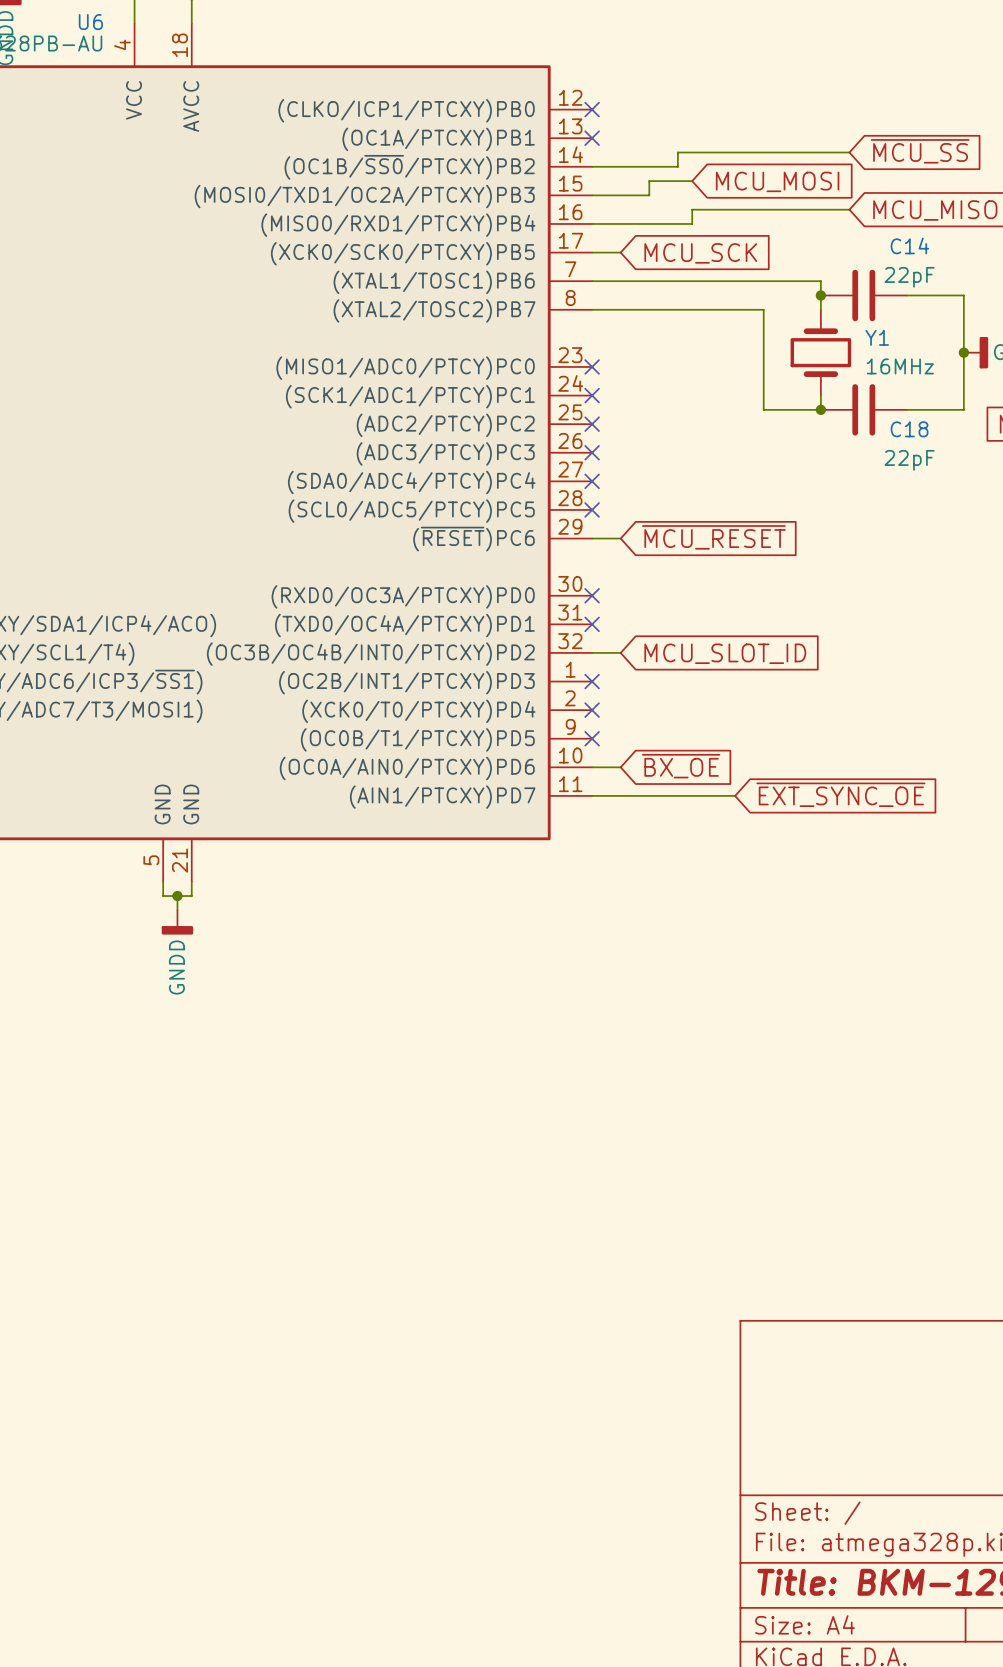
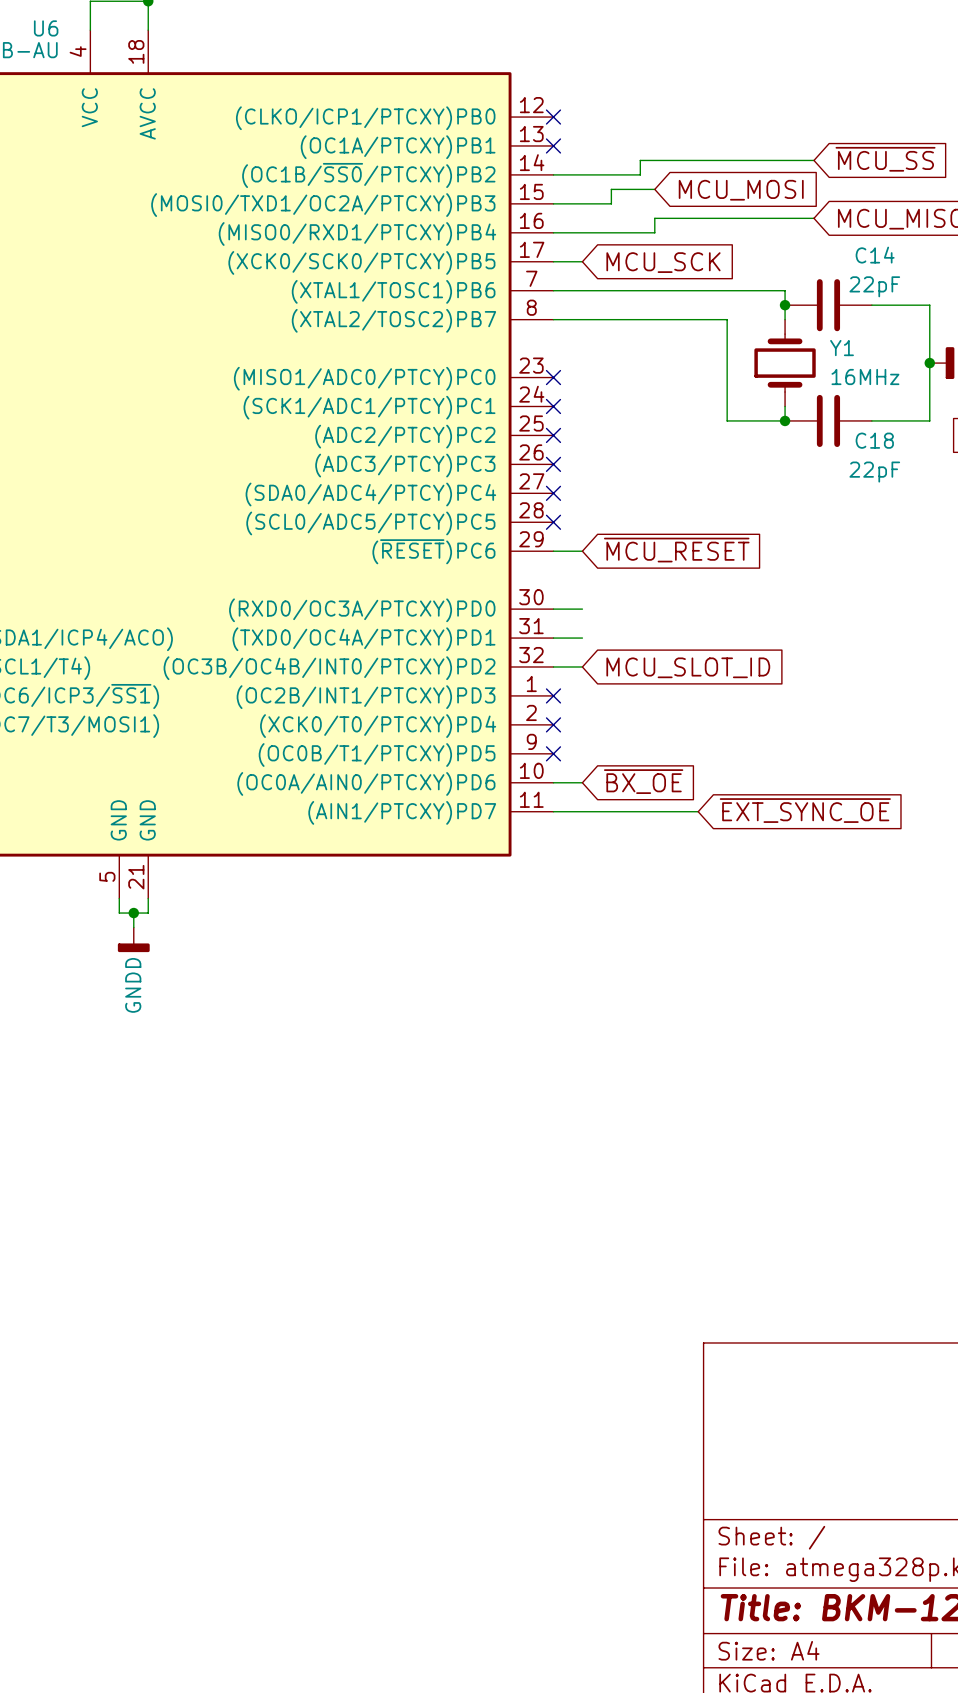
wire: none -> (553, 609) (582, 609)
no-connect mark: (592, 595) -> none
wire: none -> (553, 638) (582, 638)
no-connect mark: (592, 624) -> none

